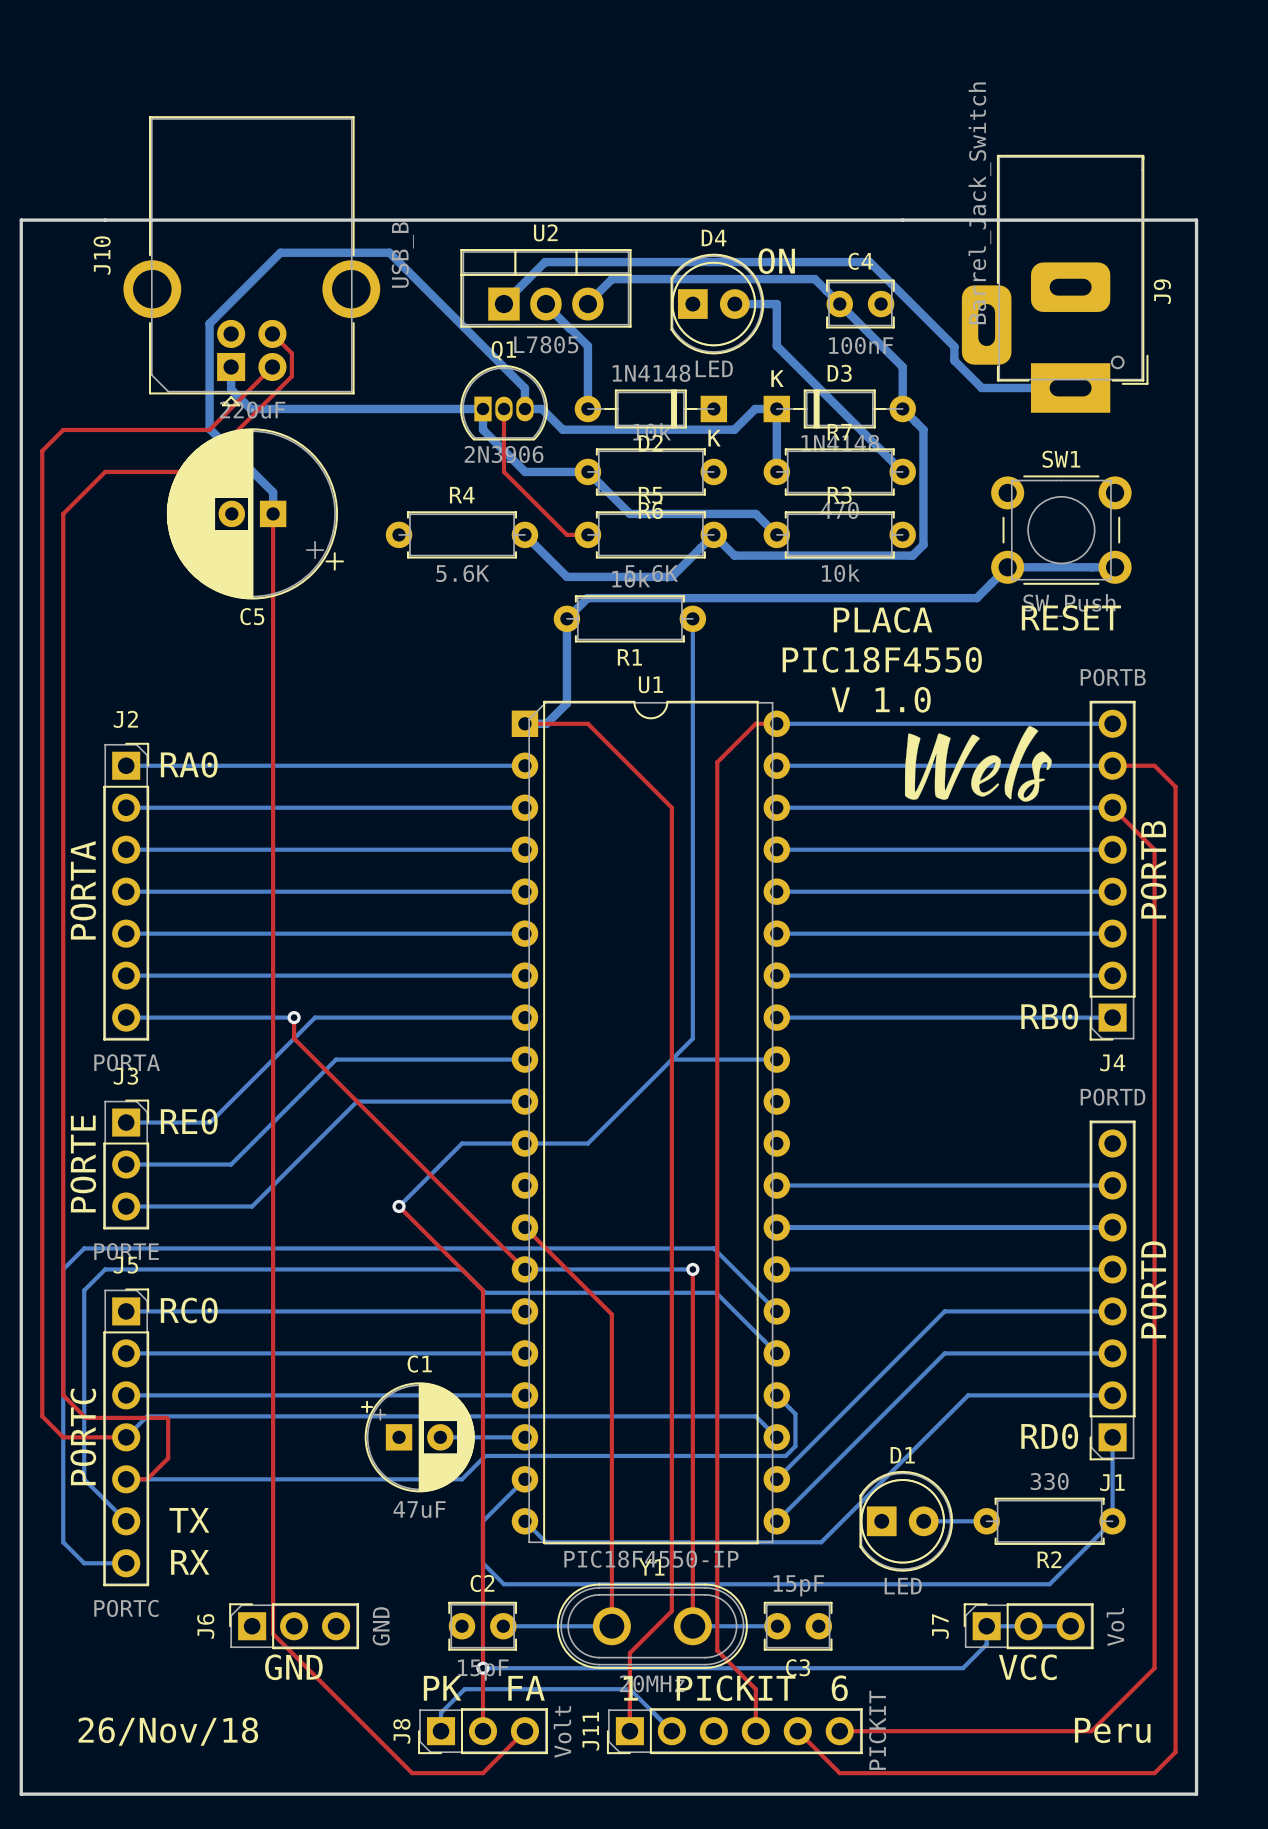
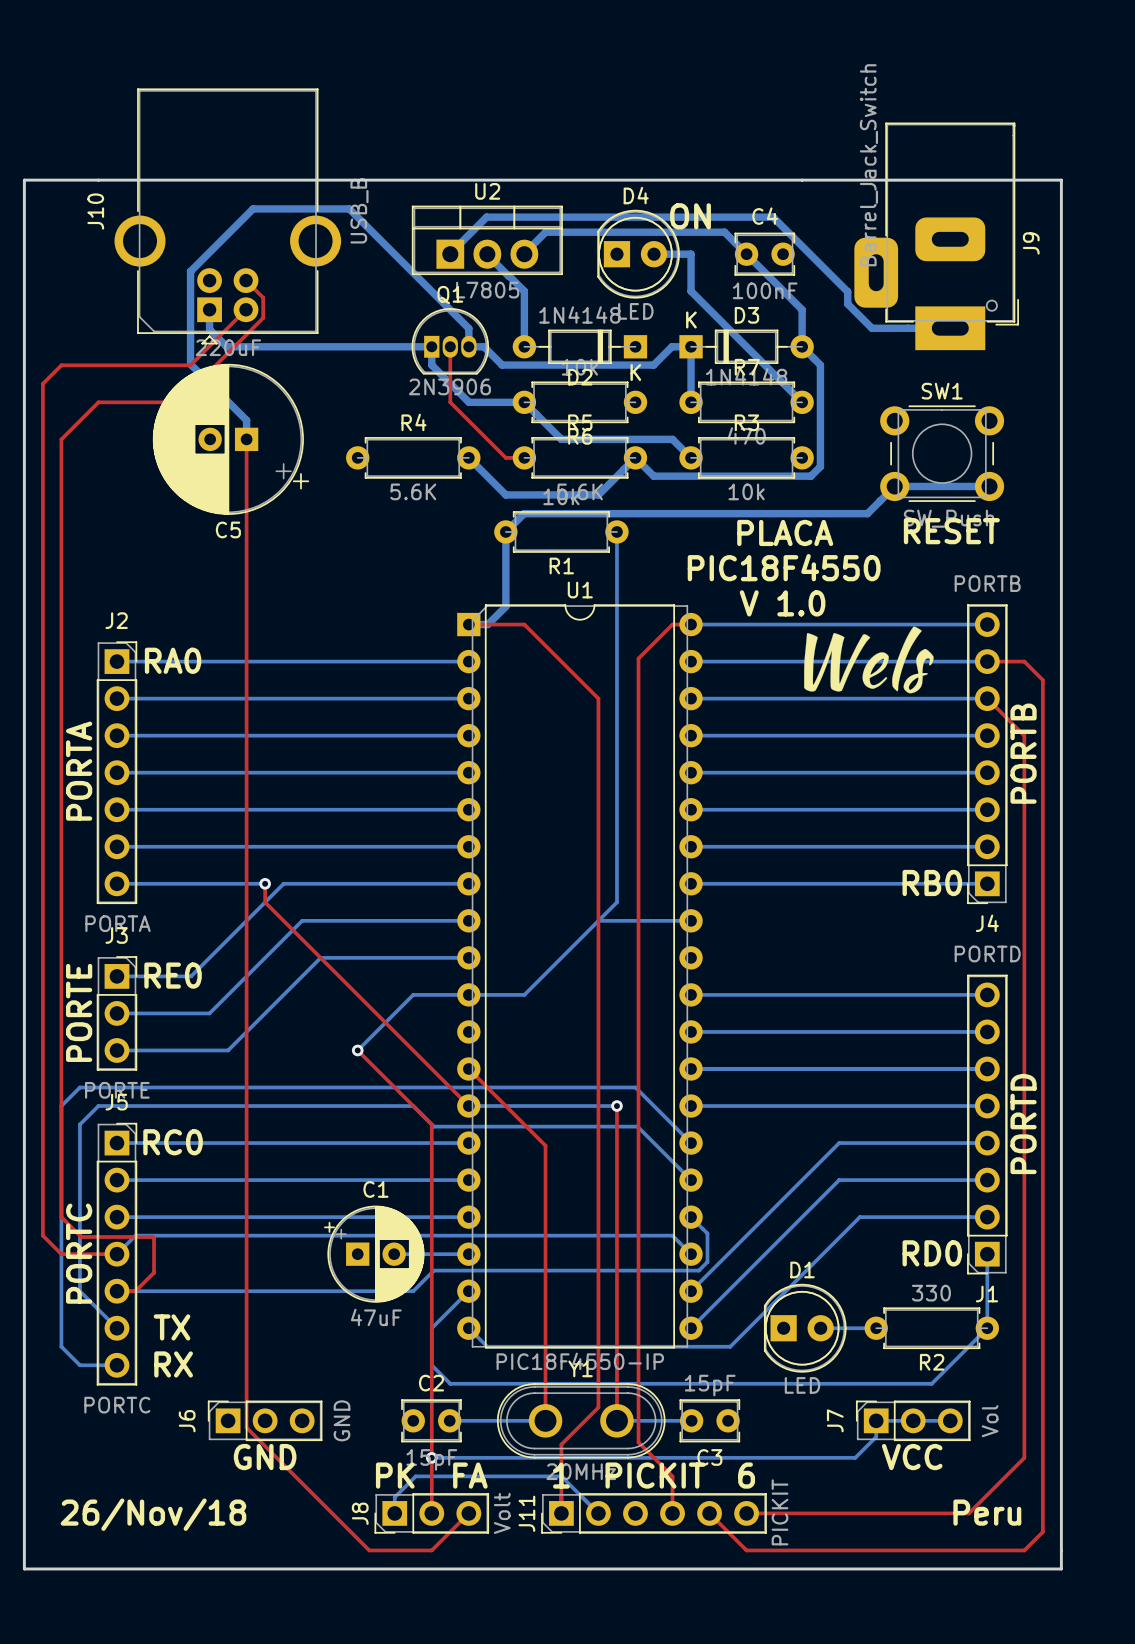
bottom track: none -> (691, 994) (987, 994)

